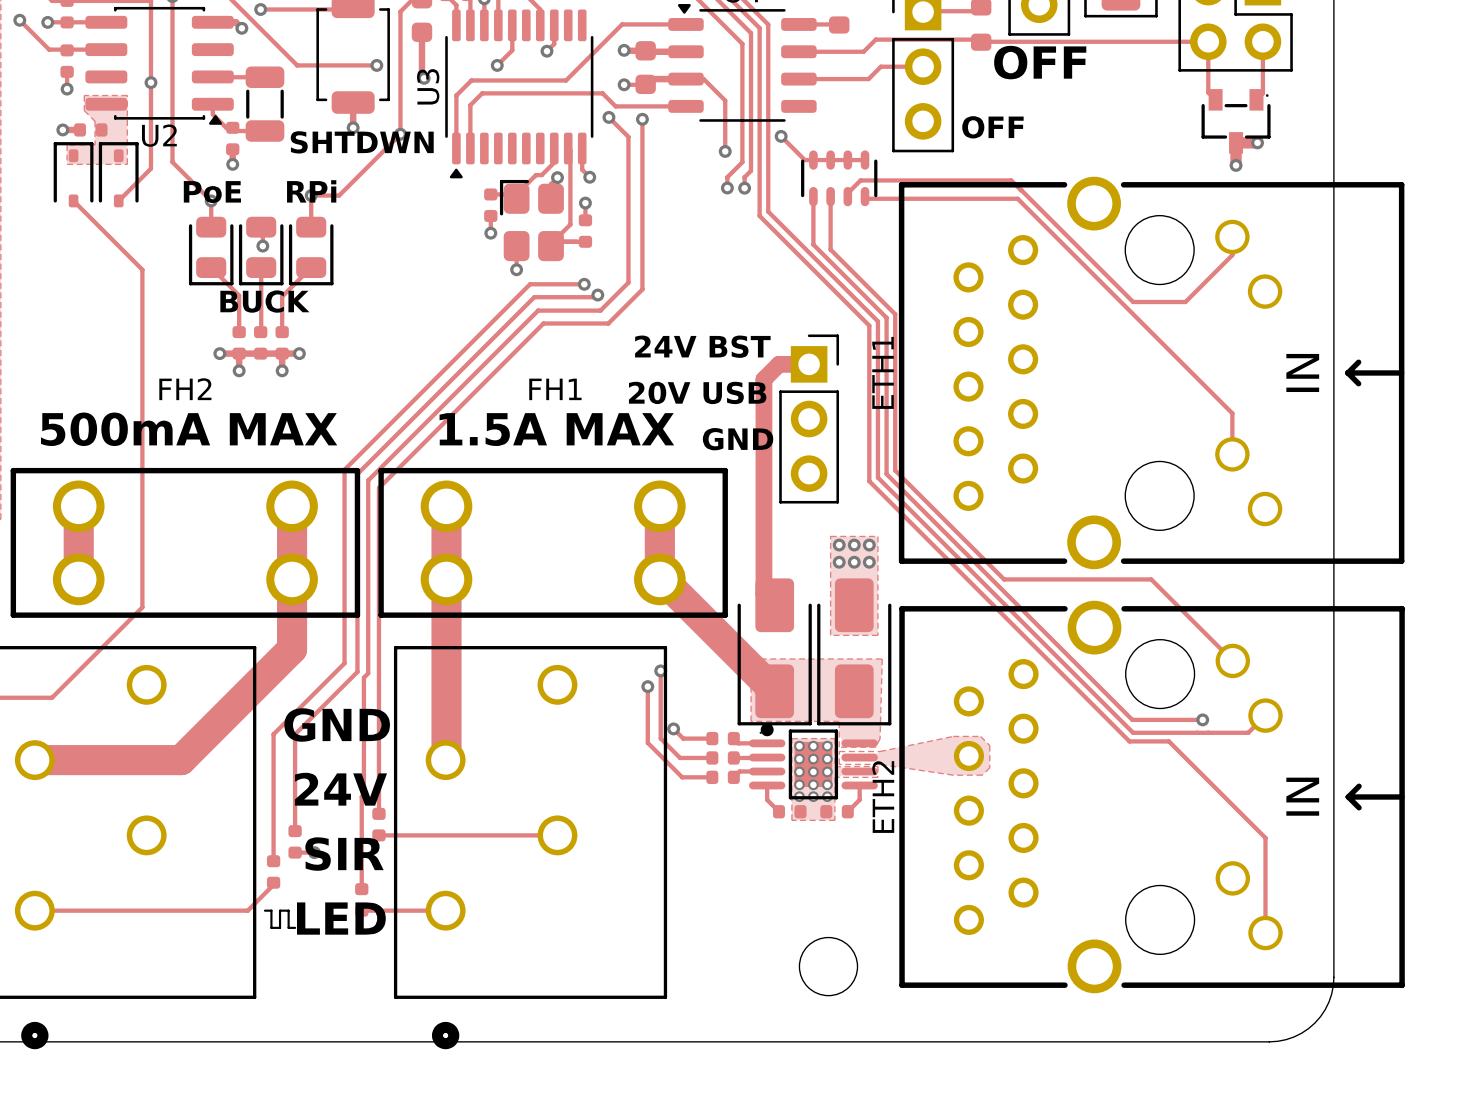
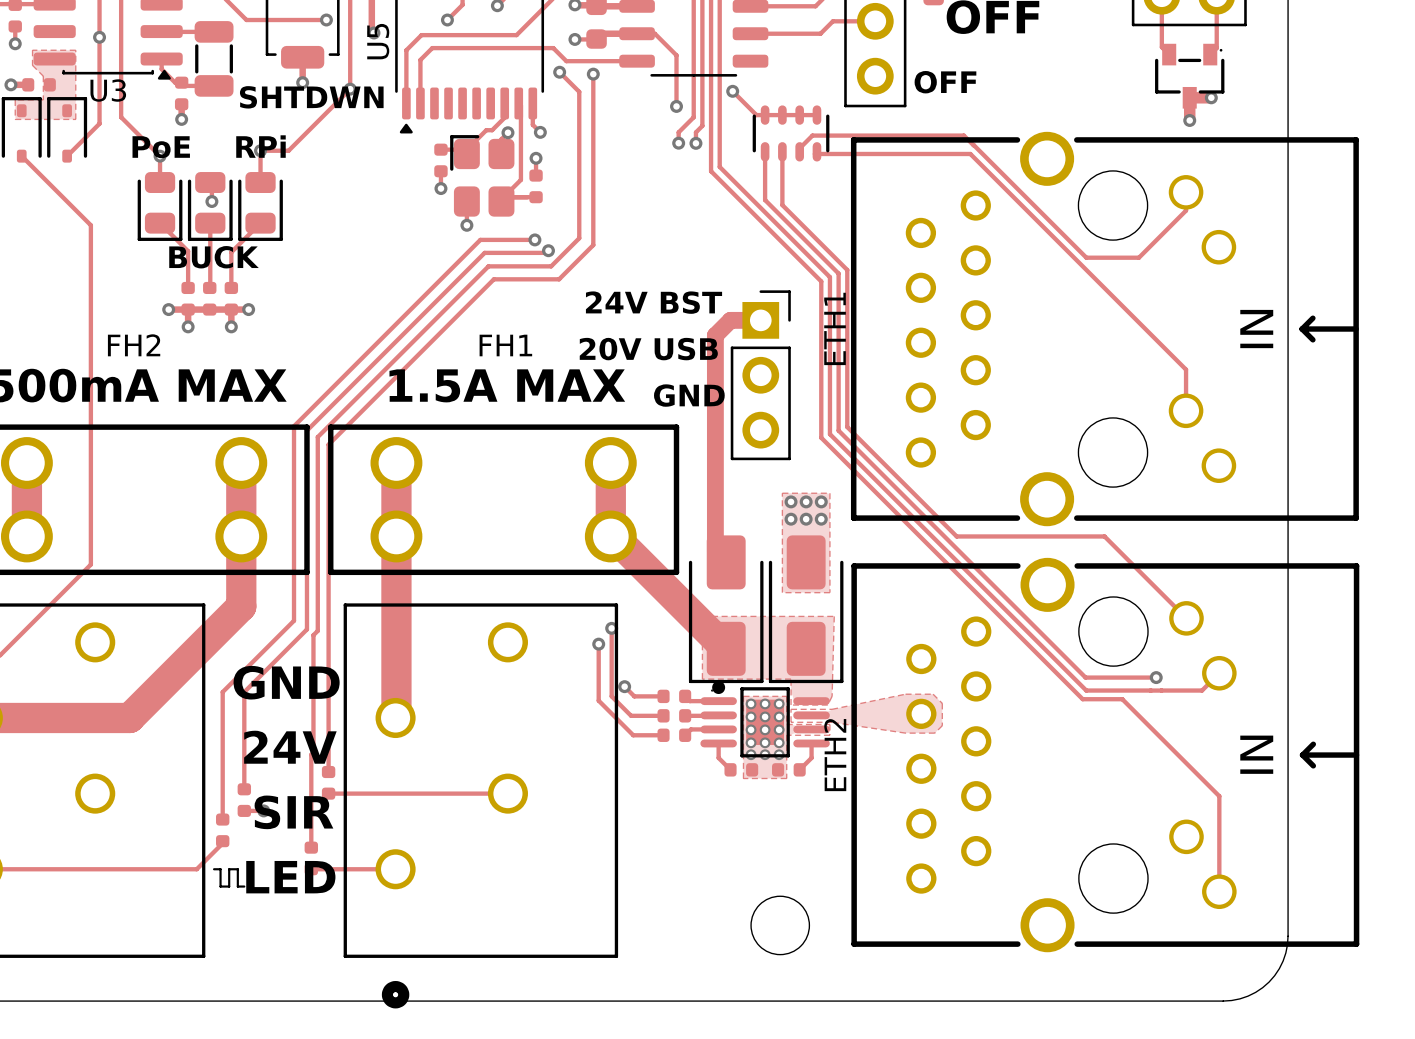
U3 name: U3 (428, 86) -> U5 (378, 41)
U2 name: U2 (159, 135) -> U3 (108, 90)

